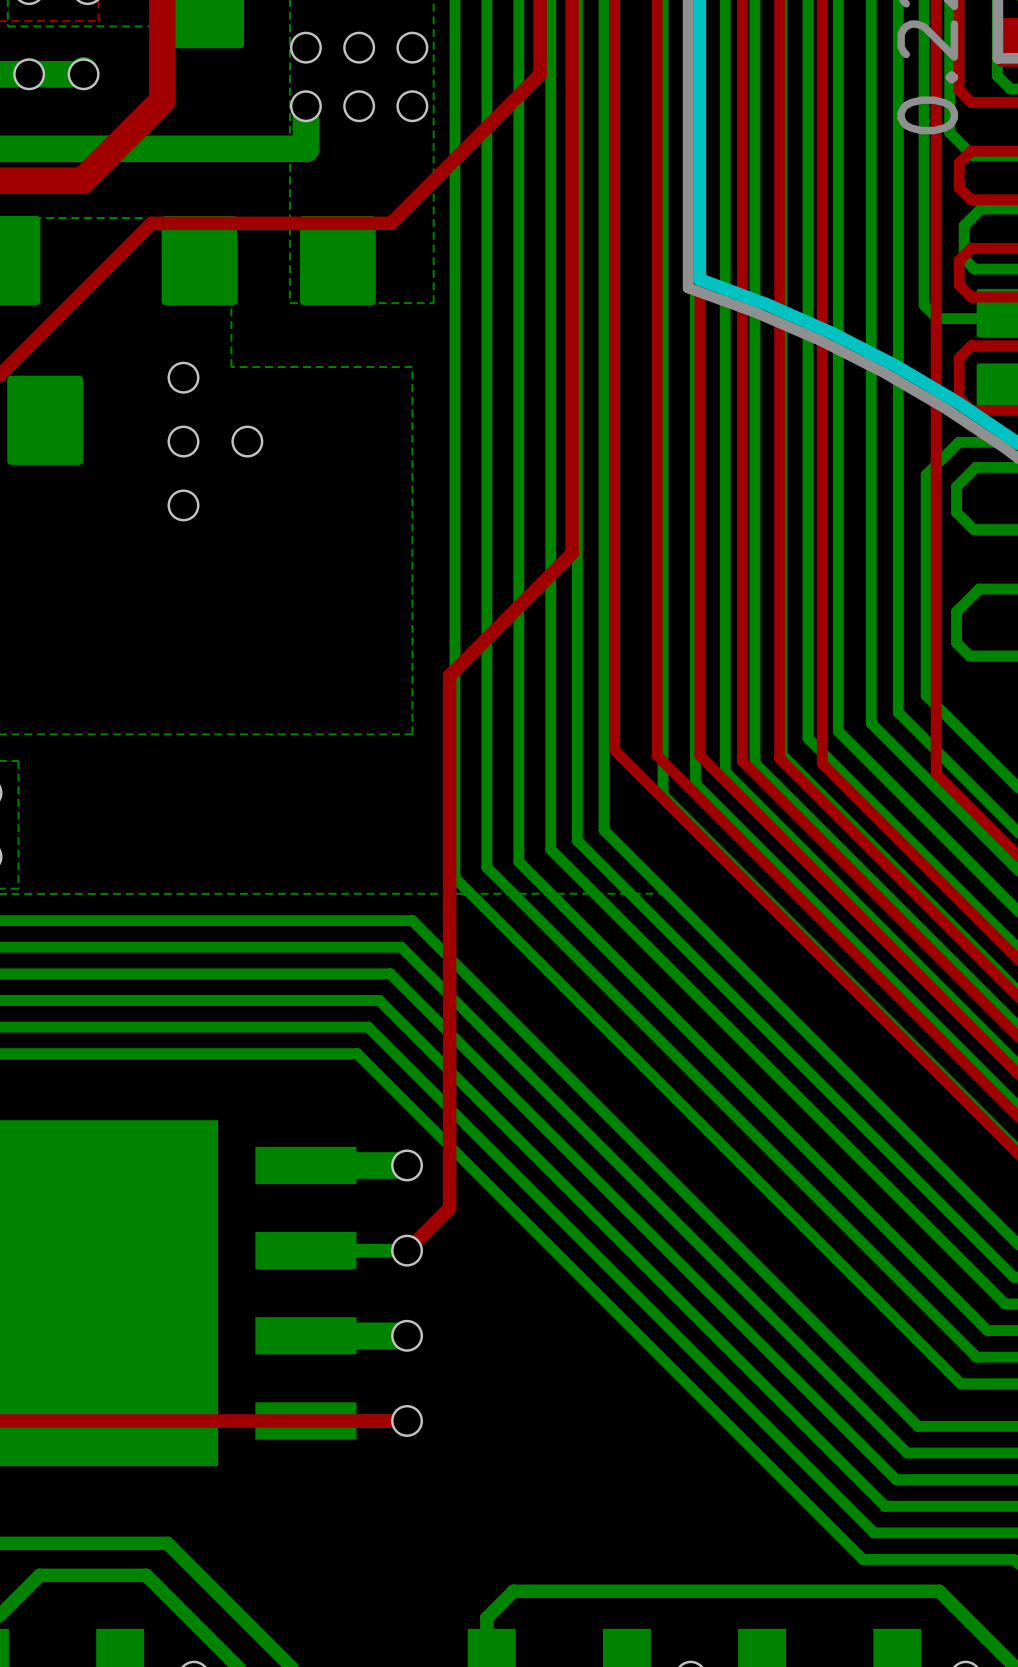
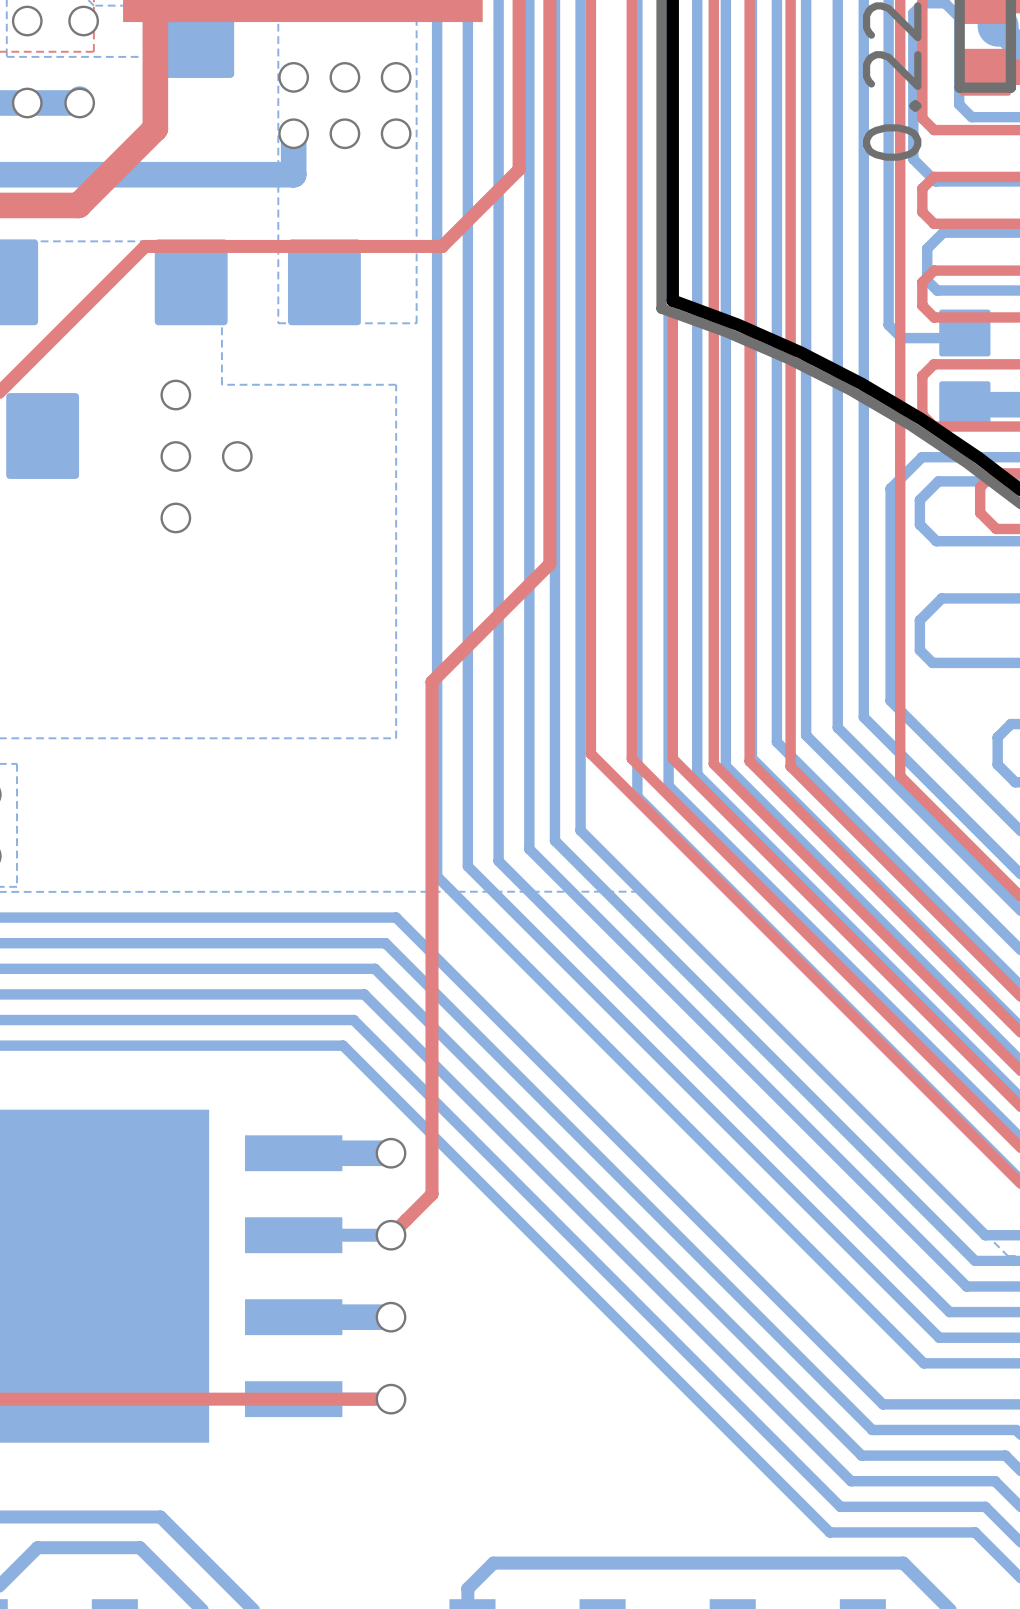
top track: (540, 74) (391, 223) -> (519, 103) (519, 169) (442, 246) (375, 246)

